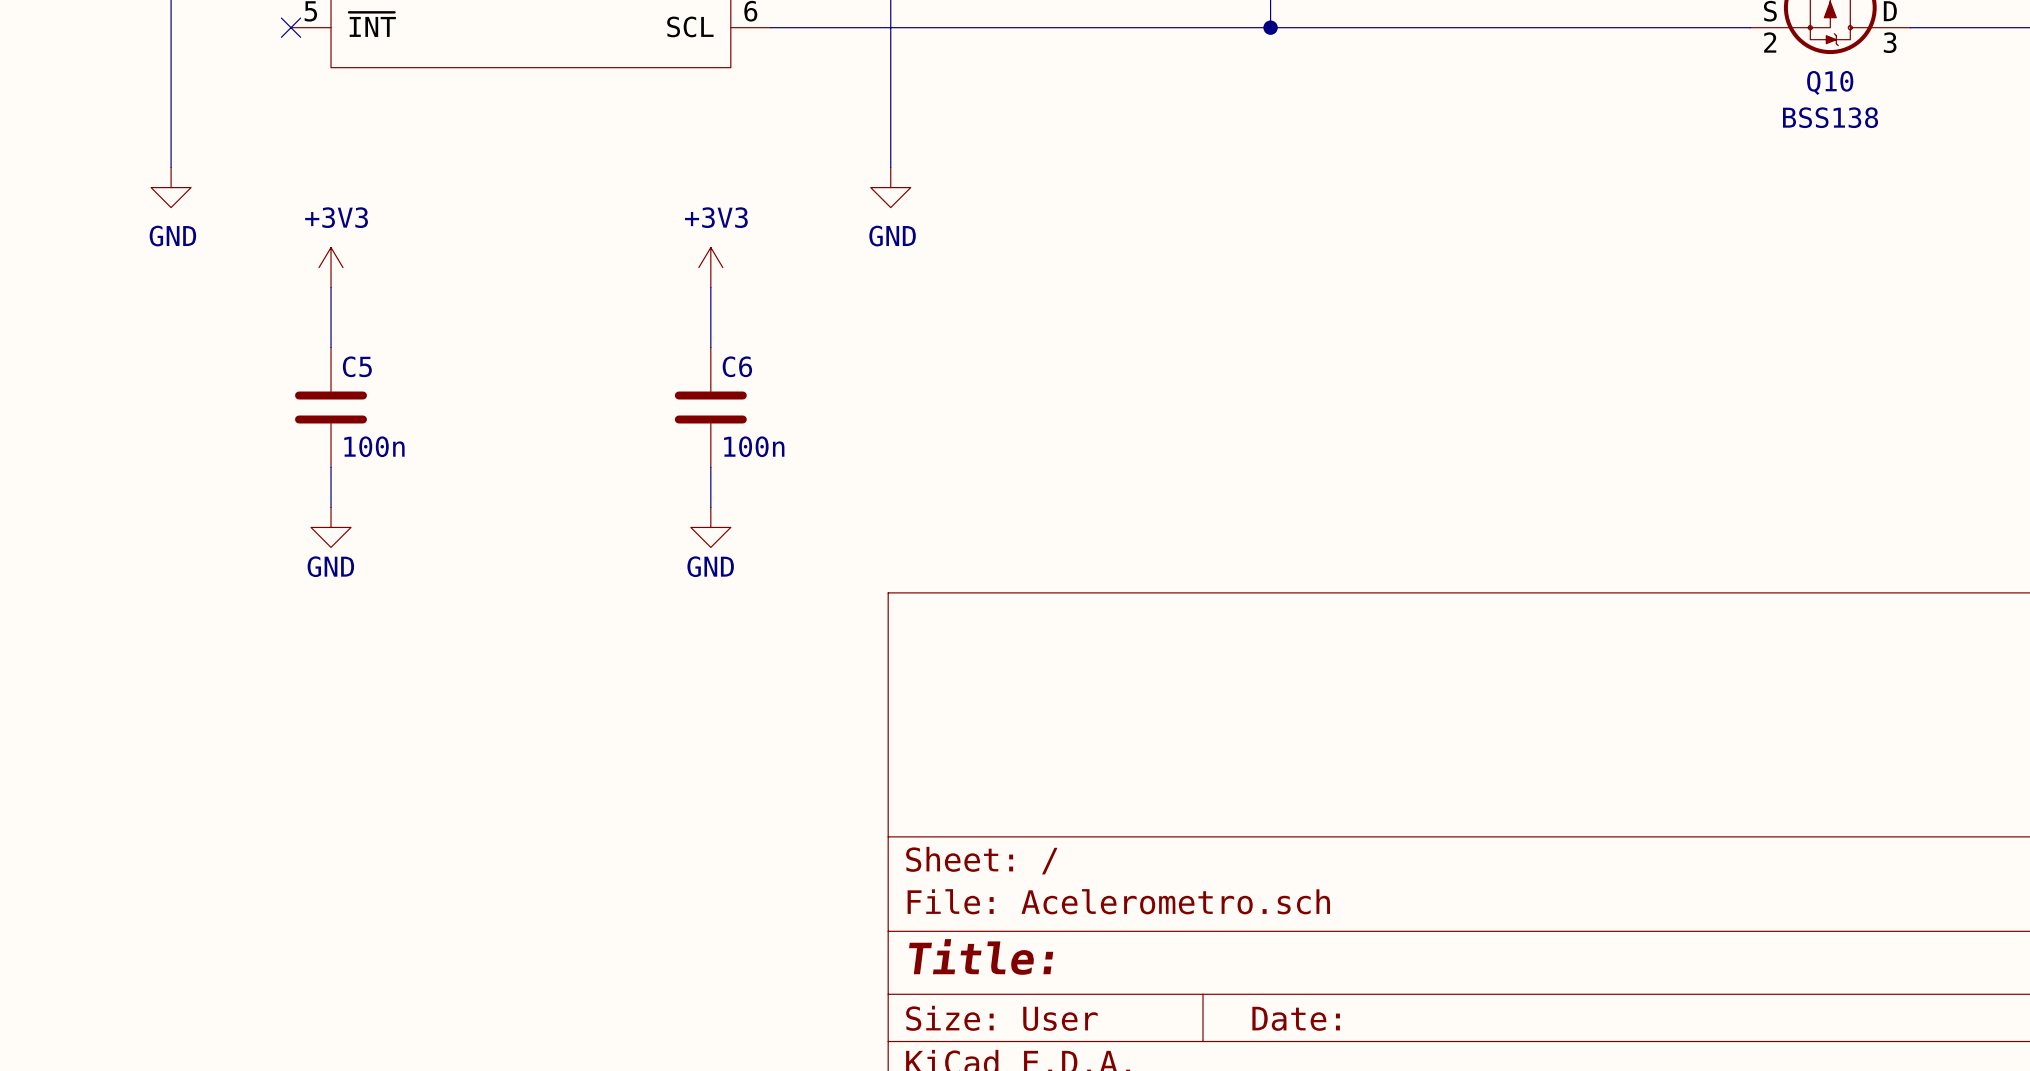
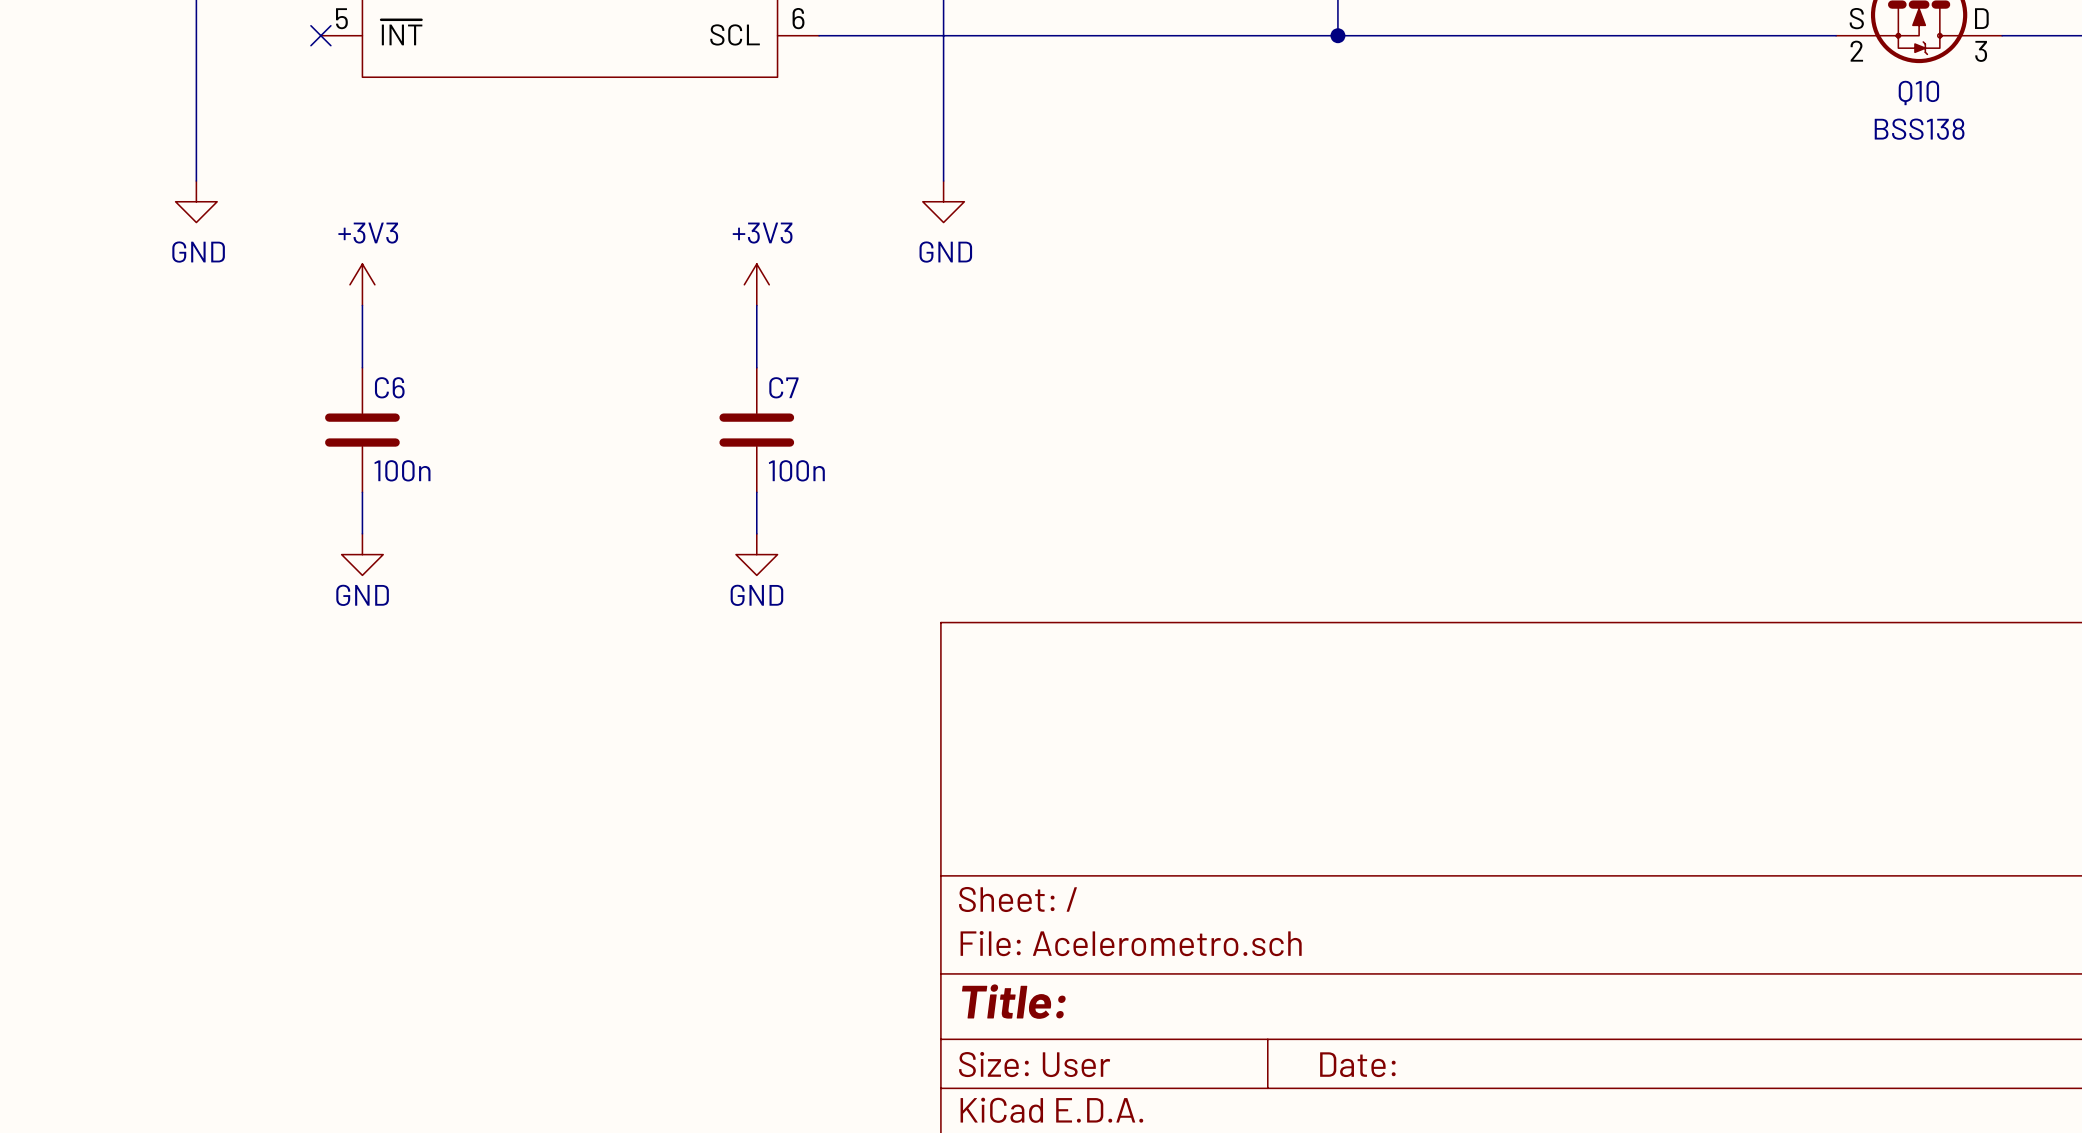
C5 name: C5 (357, 366) -> C6 (389, 387)
C6 name: C6 (737, 366) -> C7 (783, 387)

